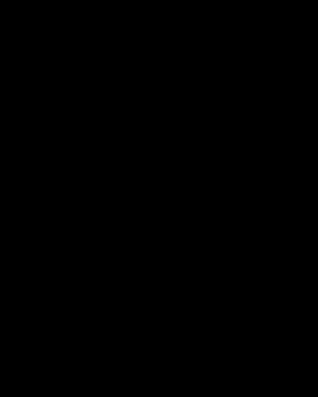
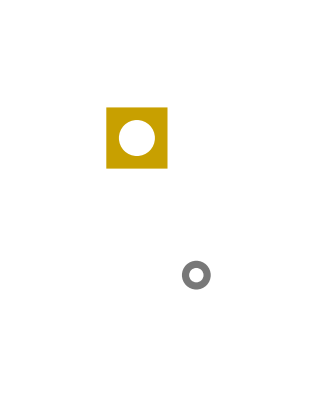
part: none -> (136, 138)
via: none -> (196, 275)

